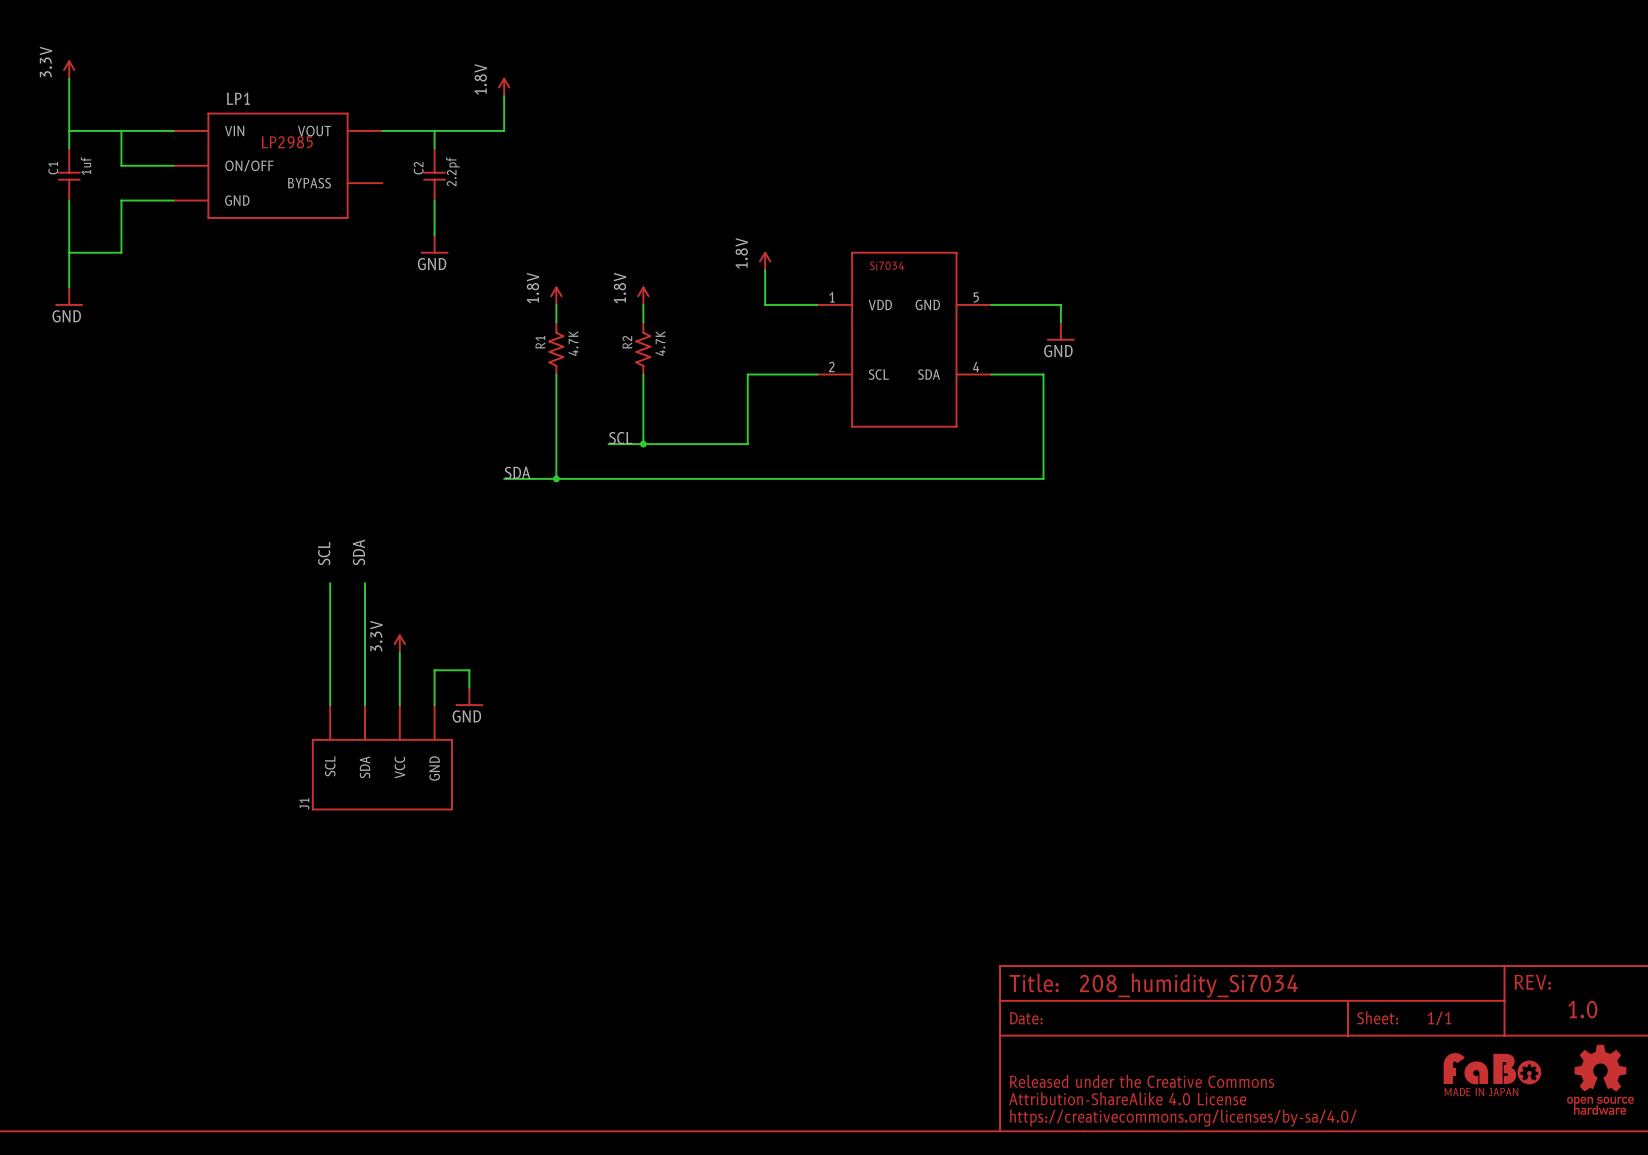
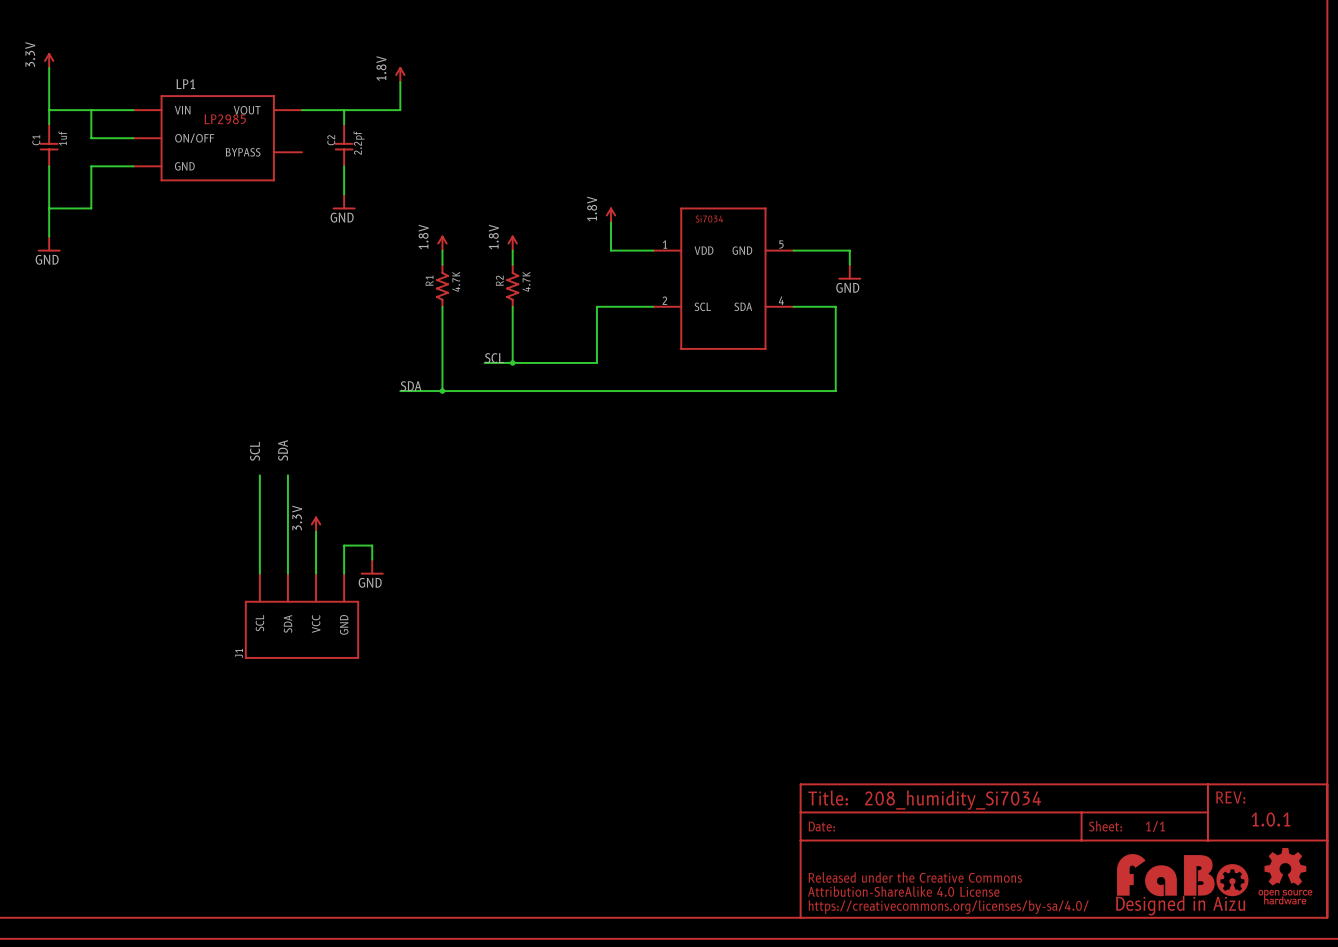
text: 1.0 (1582, 1009) -> 1.0.1 (1270, 819)
part: (1492, 1068) -> none
part: none -> (1182, 875)

